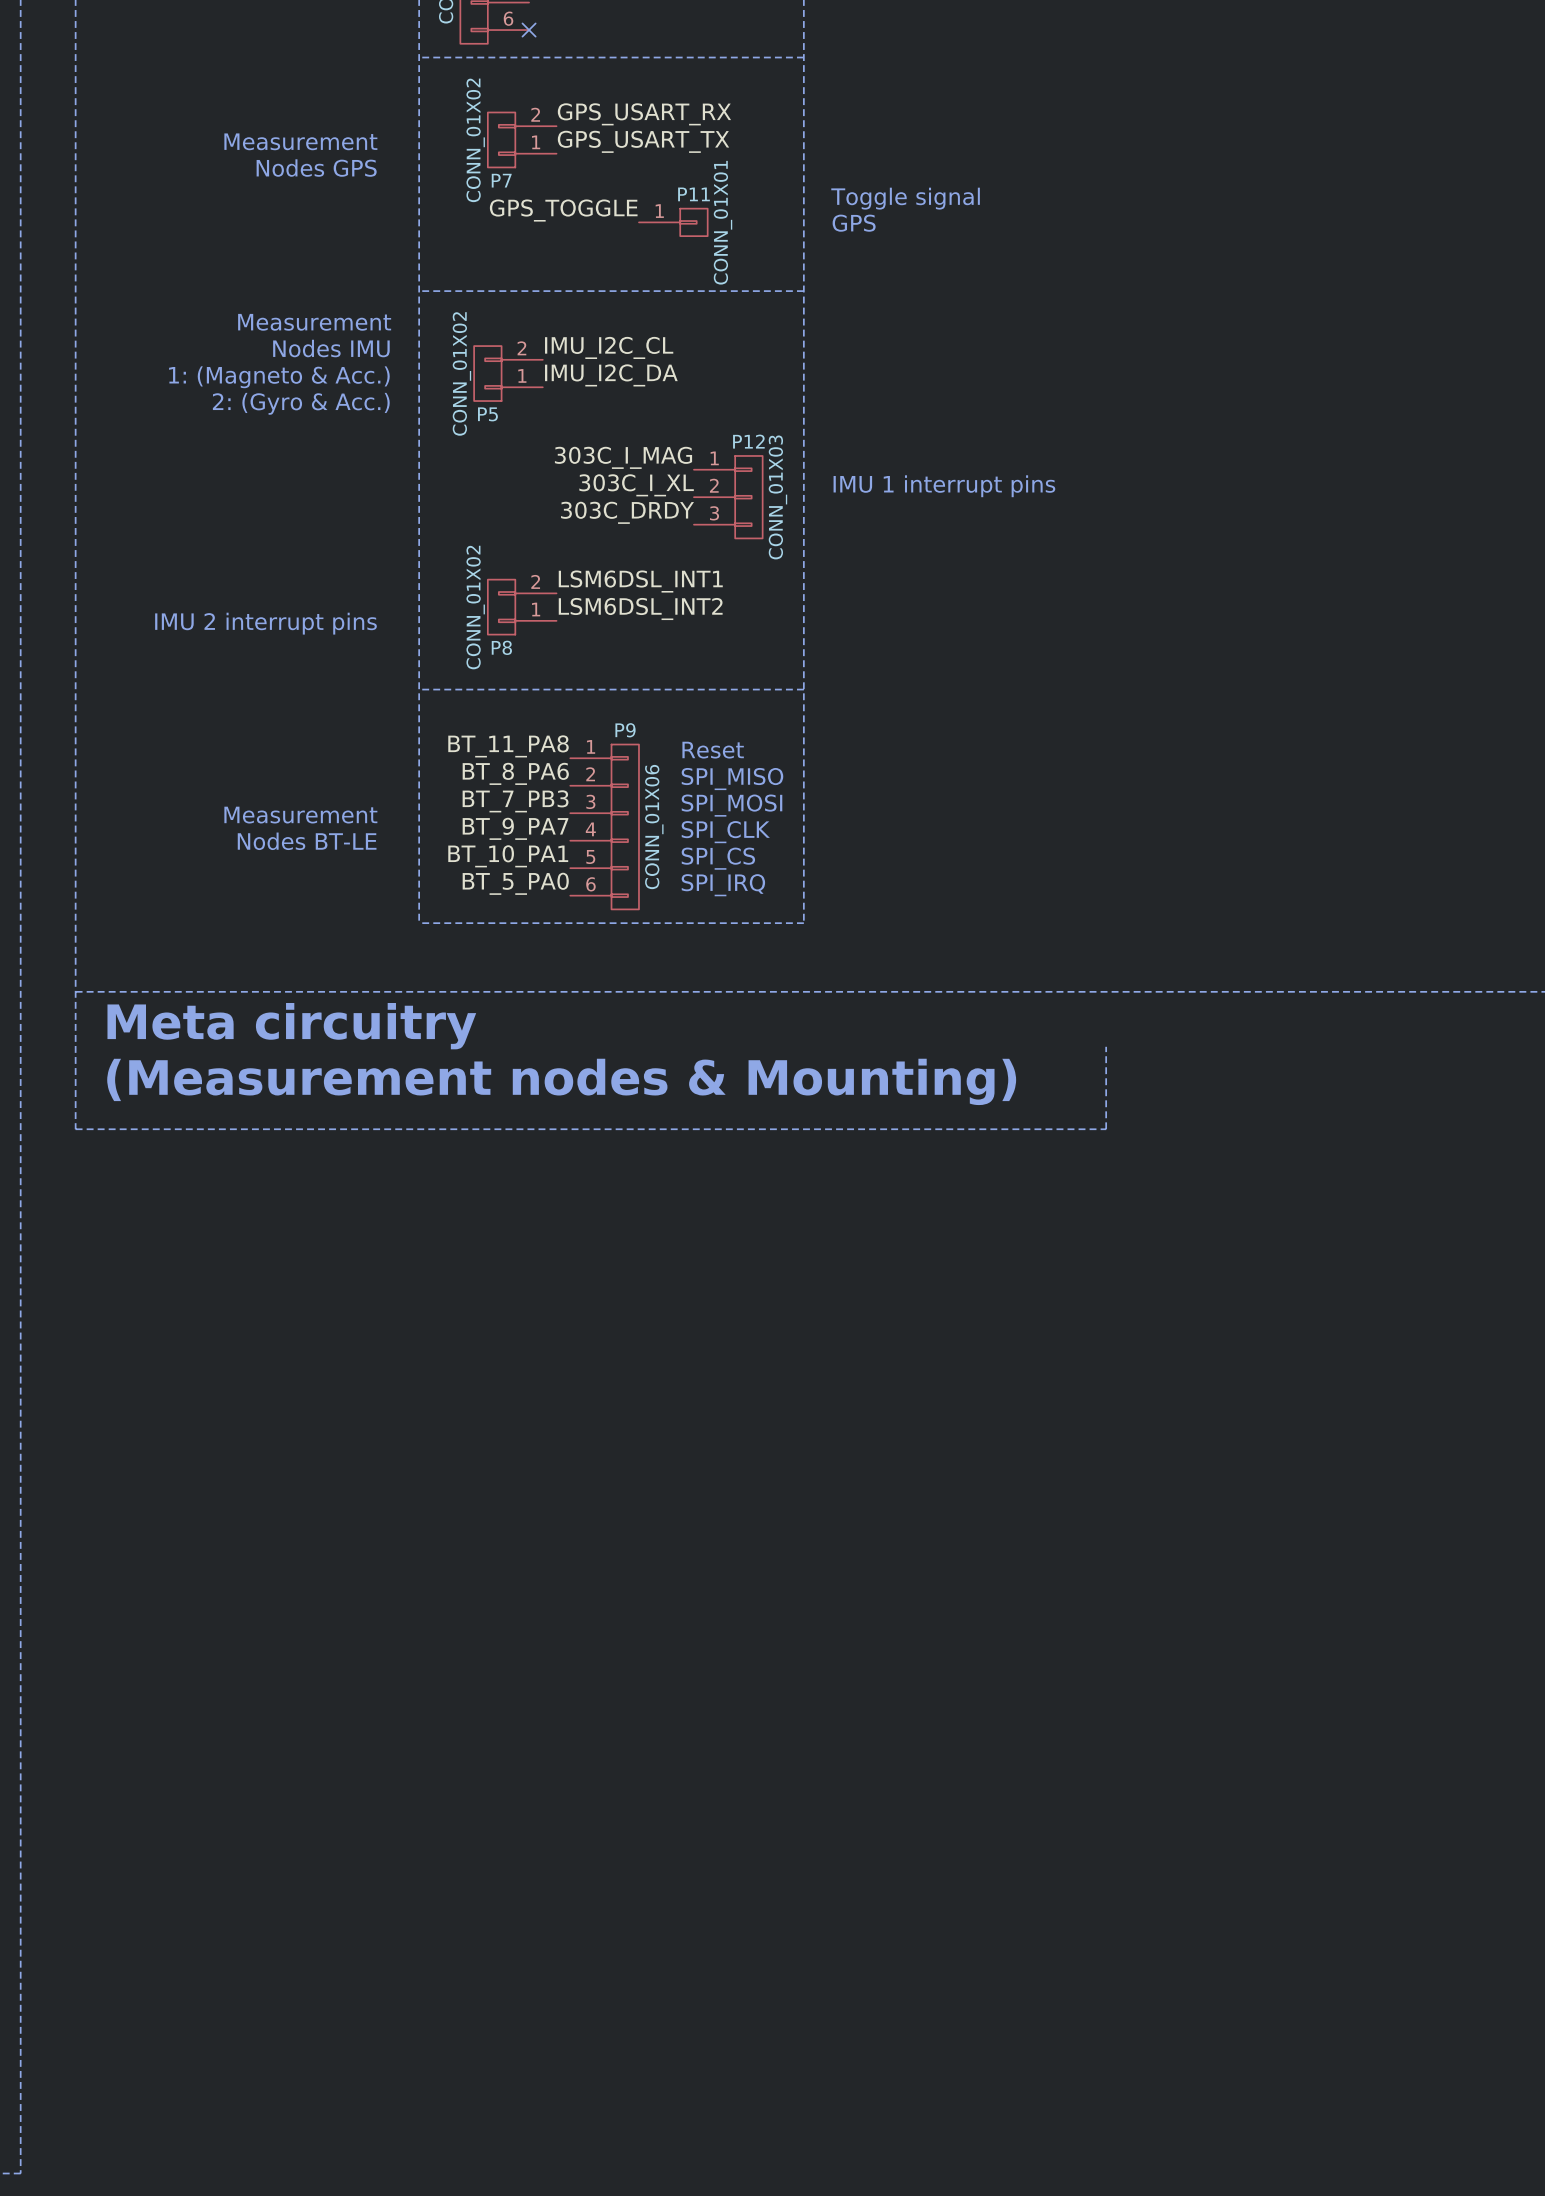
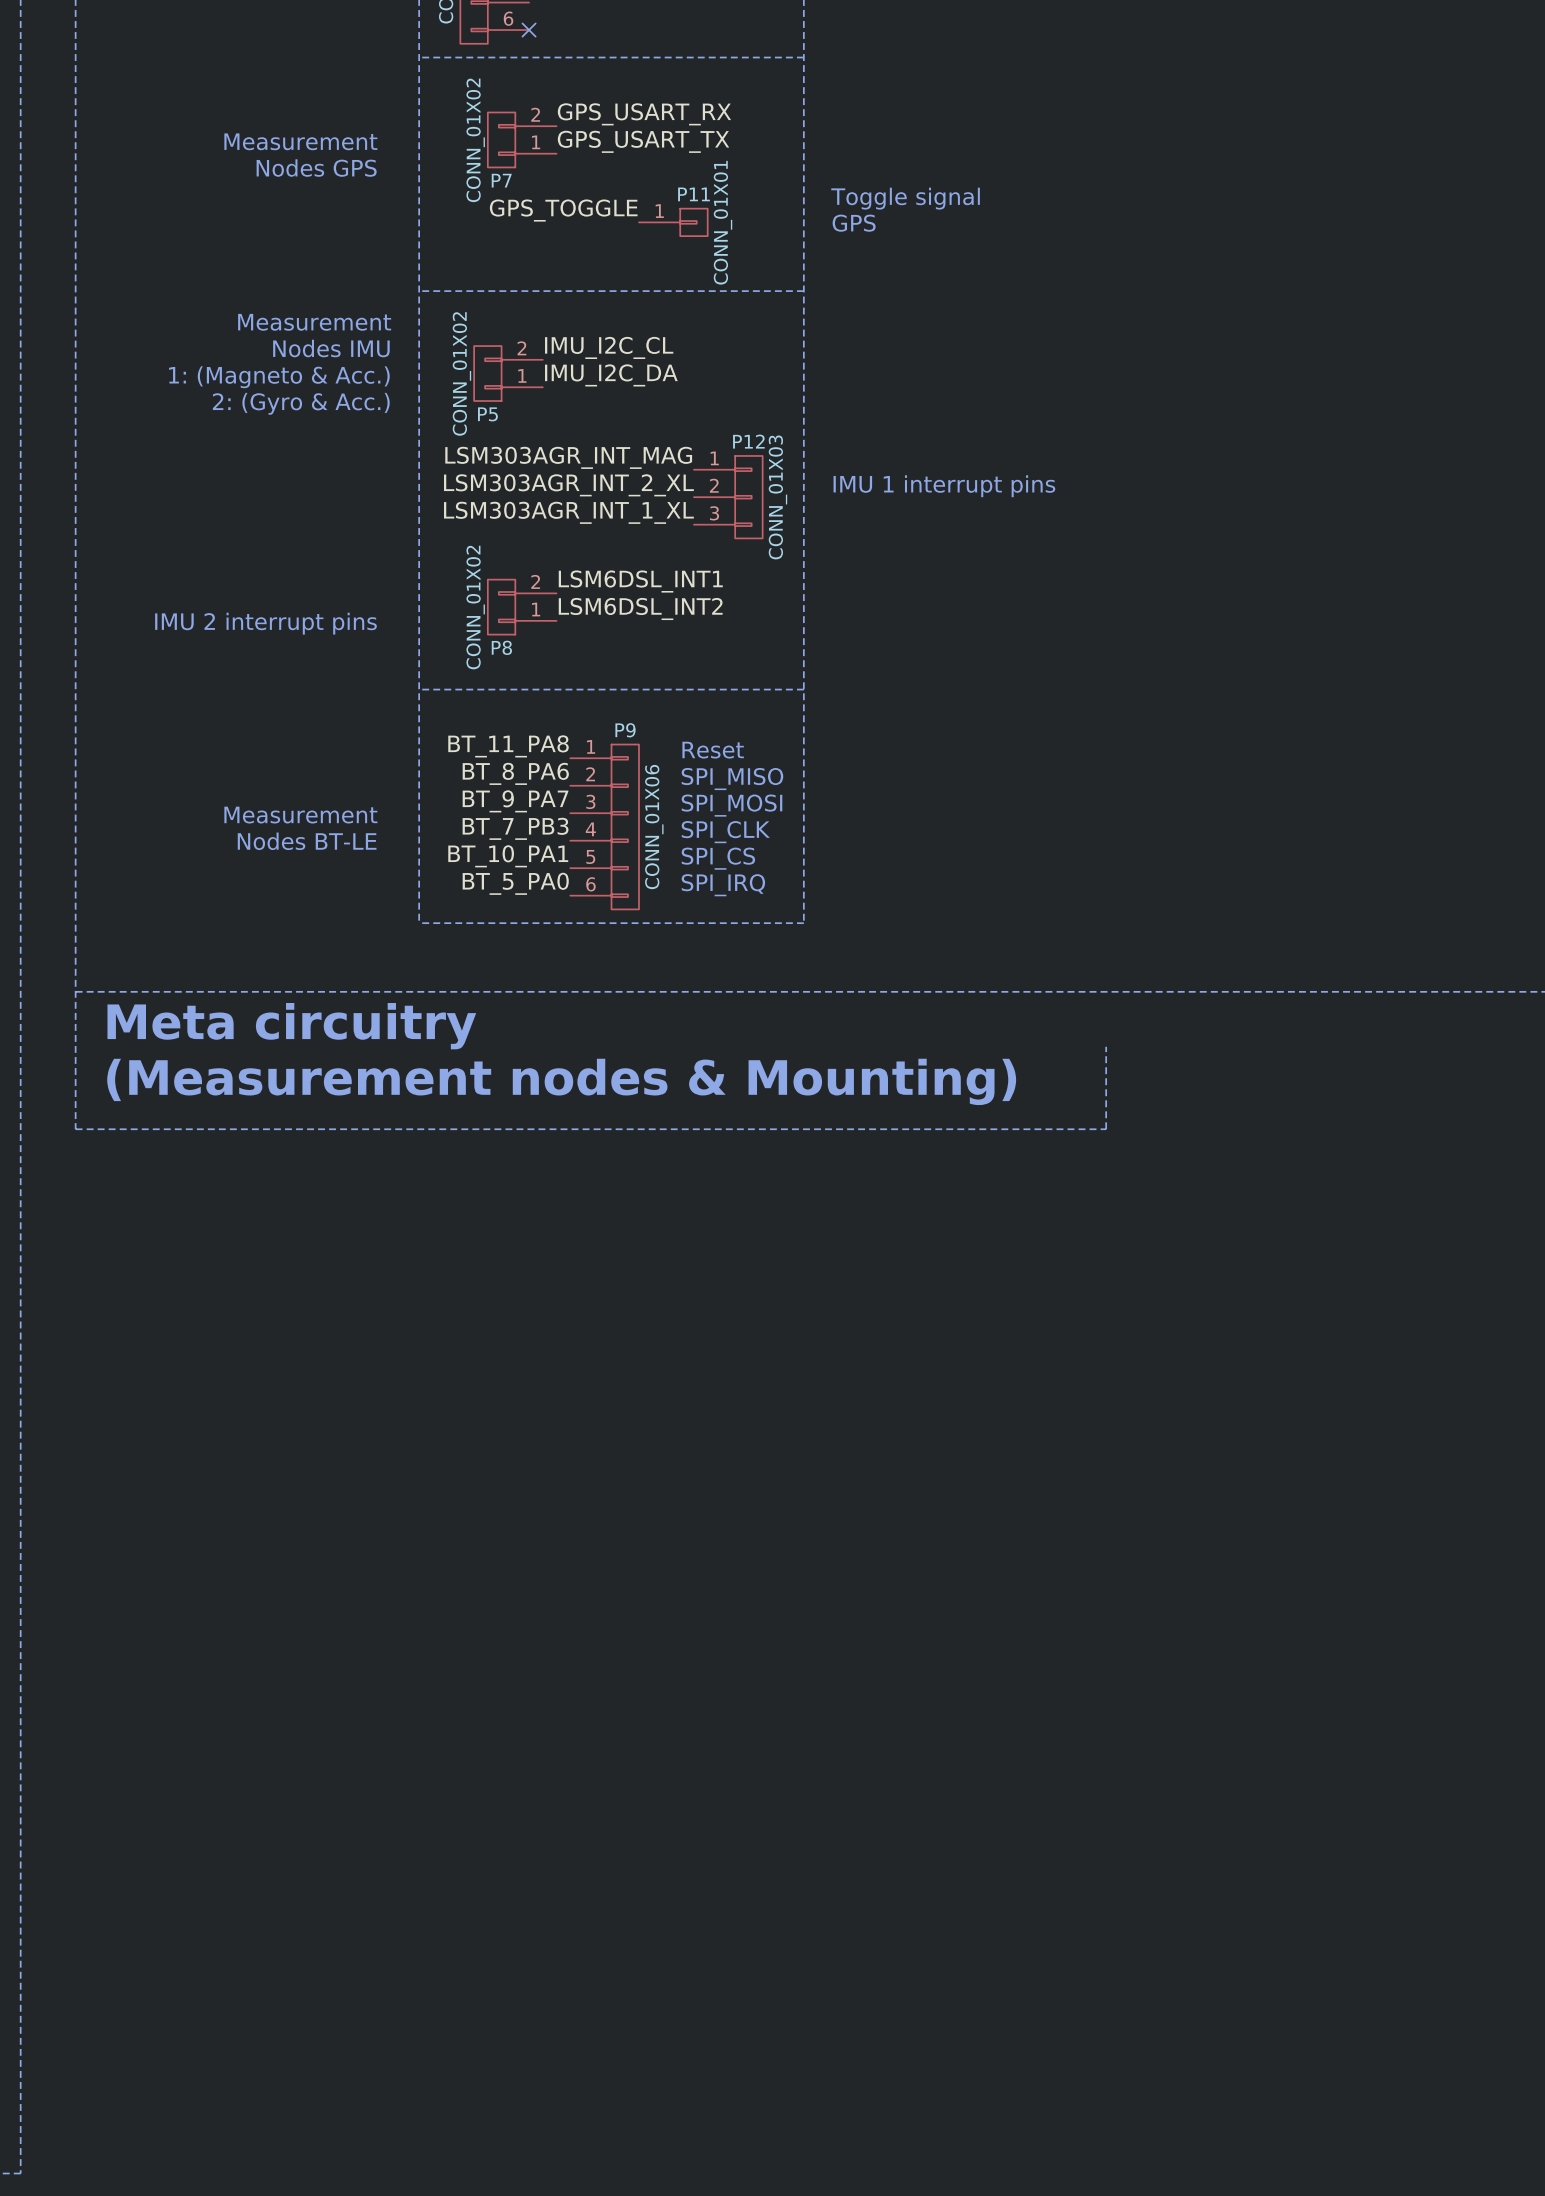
label: 303C_I_MAG (623, 457) -> LSM303AGR_INT_MAG (568, 457)
label: 303C_I_XL (636, 485) -> LSM303AGR_INT_2_XL (568, 485)
label: 303C_DRDY (627, 512) -> LSM303AGR_INT_1_XL (568, 512)
label: BT_7_PB3 (515, 801) -> BT_9_PA7 (515, 801)
label: BT_9_PA7 (515, 828) -> BT_7_PB3 (515, 828)

